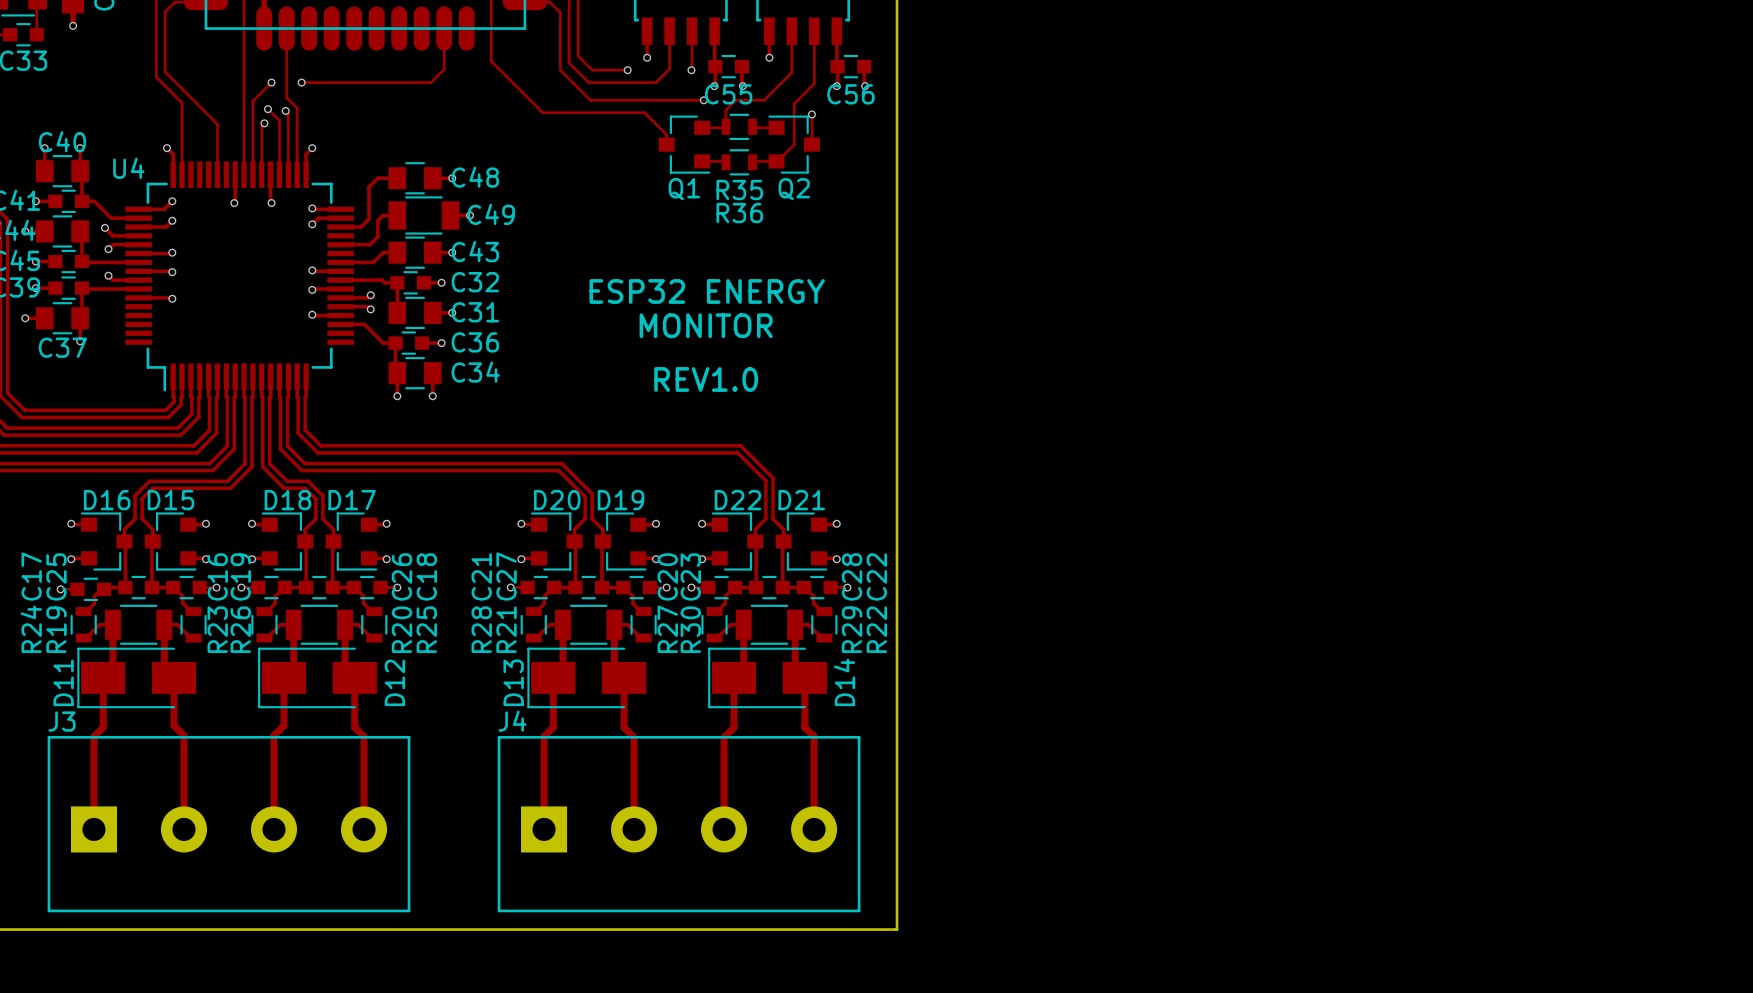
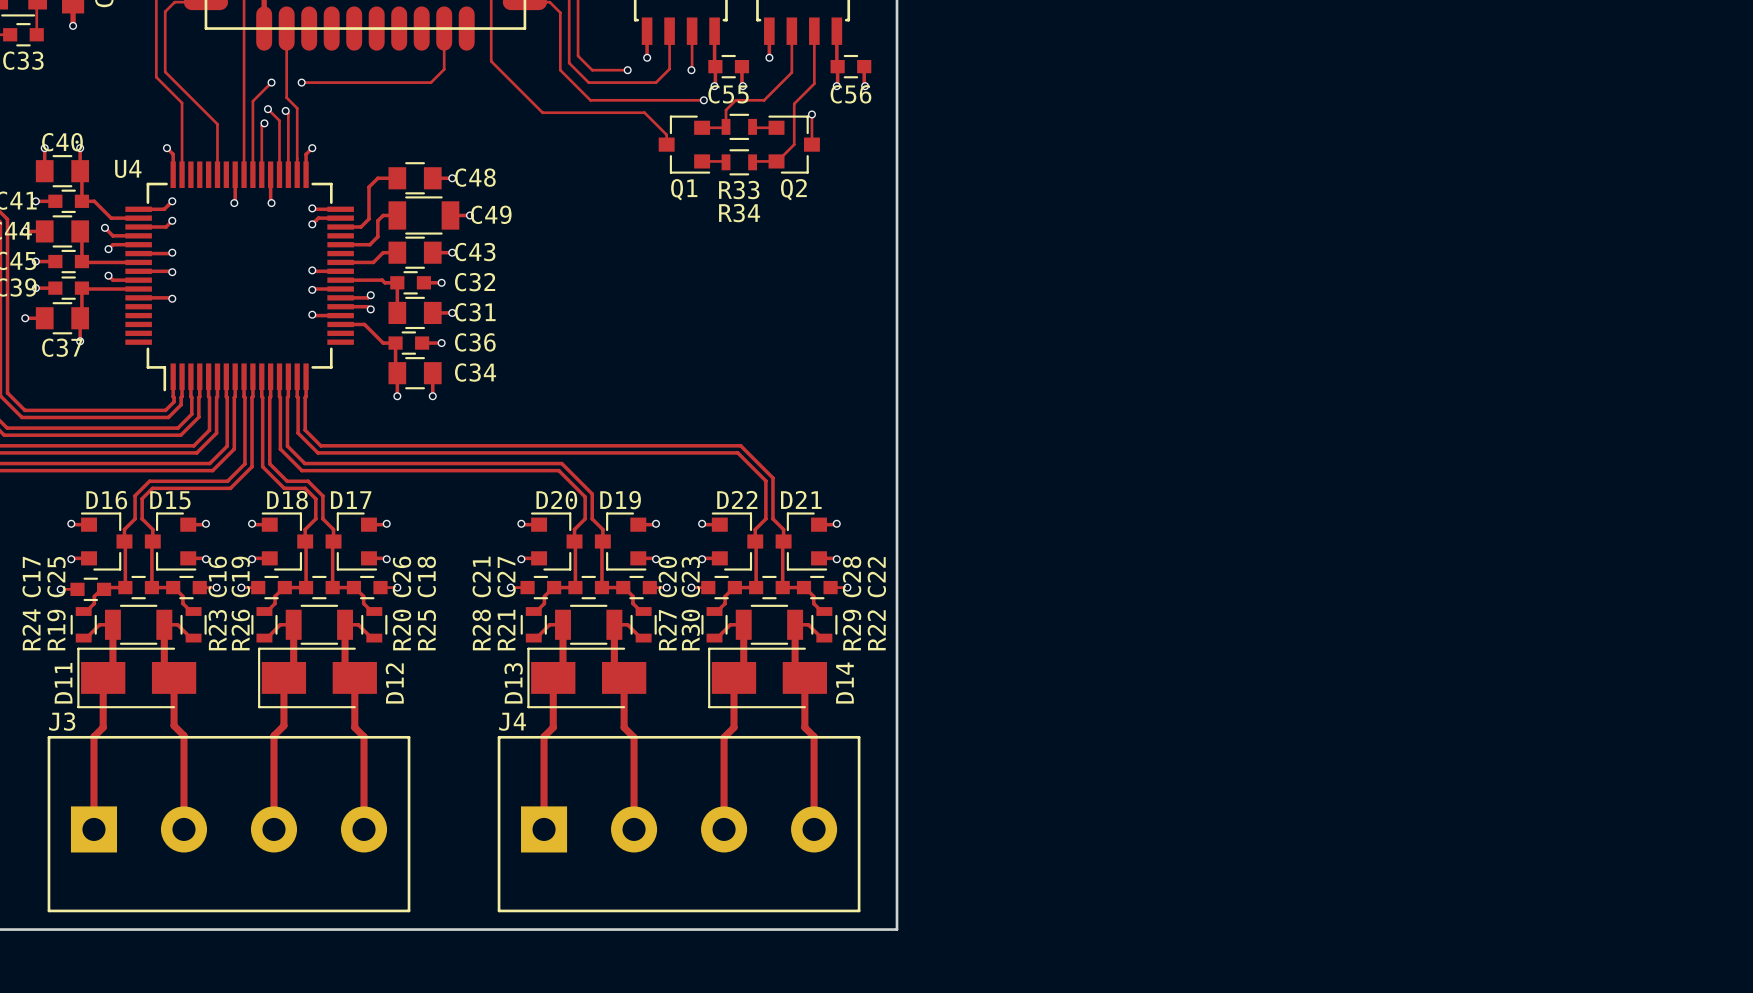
R35 name: R35 (739, 190) -> R33 (739, 190)
R36 name: R36 (739, 213) -> R34 (739, 213)
text: ESP32 ENERGY (707, 291) -> none
text: MONITOR (706, 325) -> none
text: REV1.0 (706, 379) -> none

